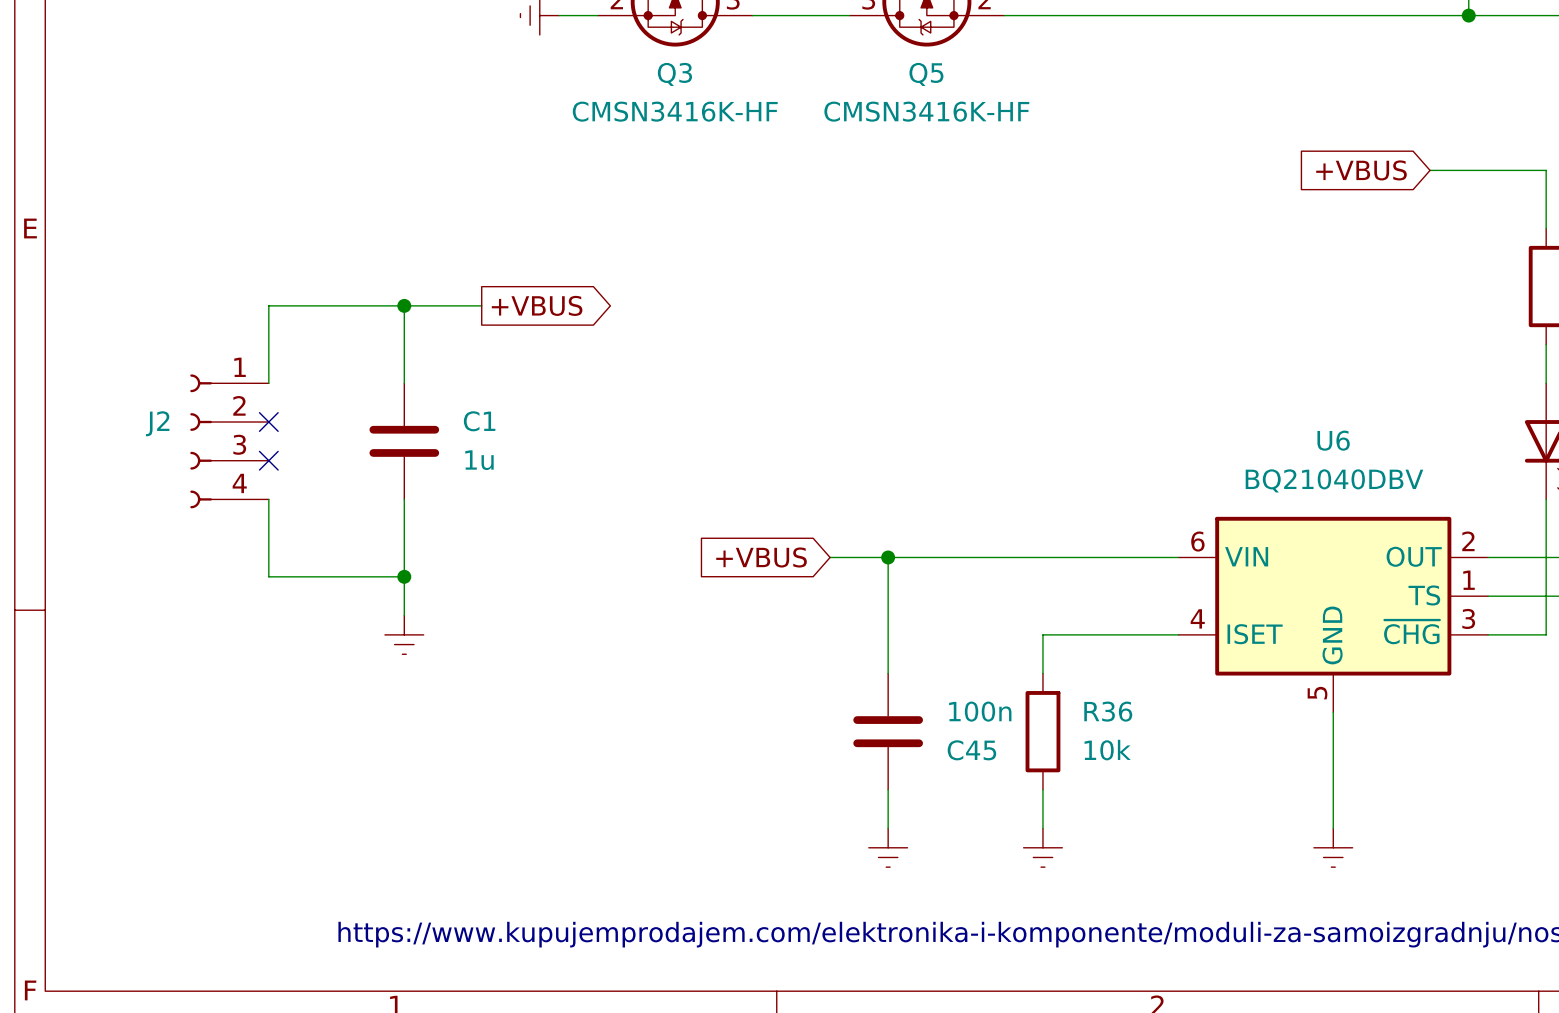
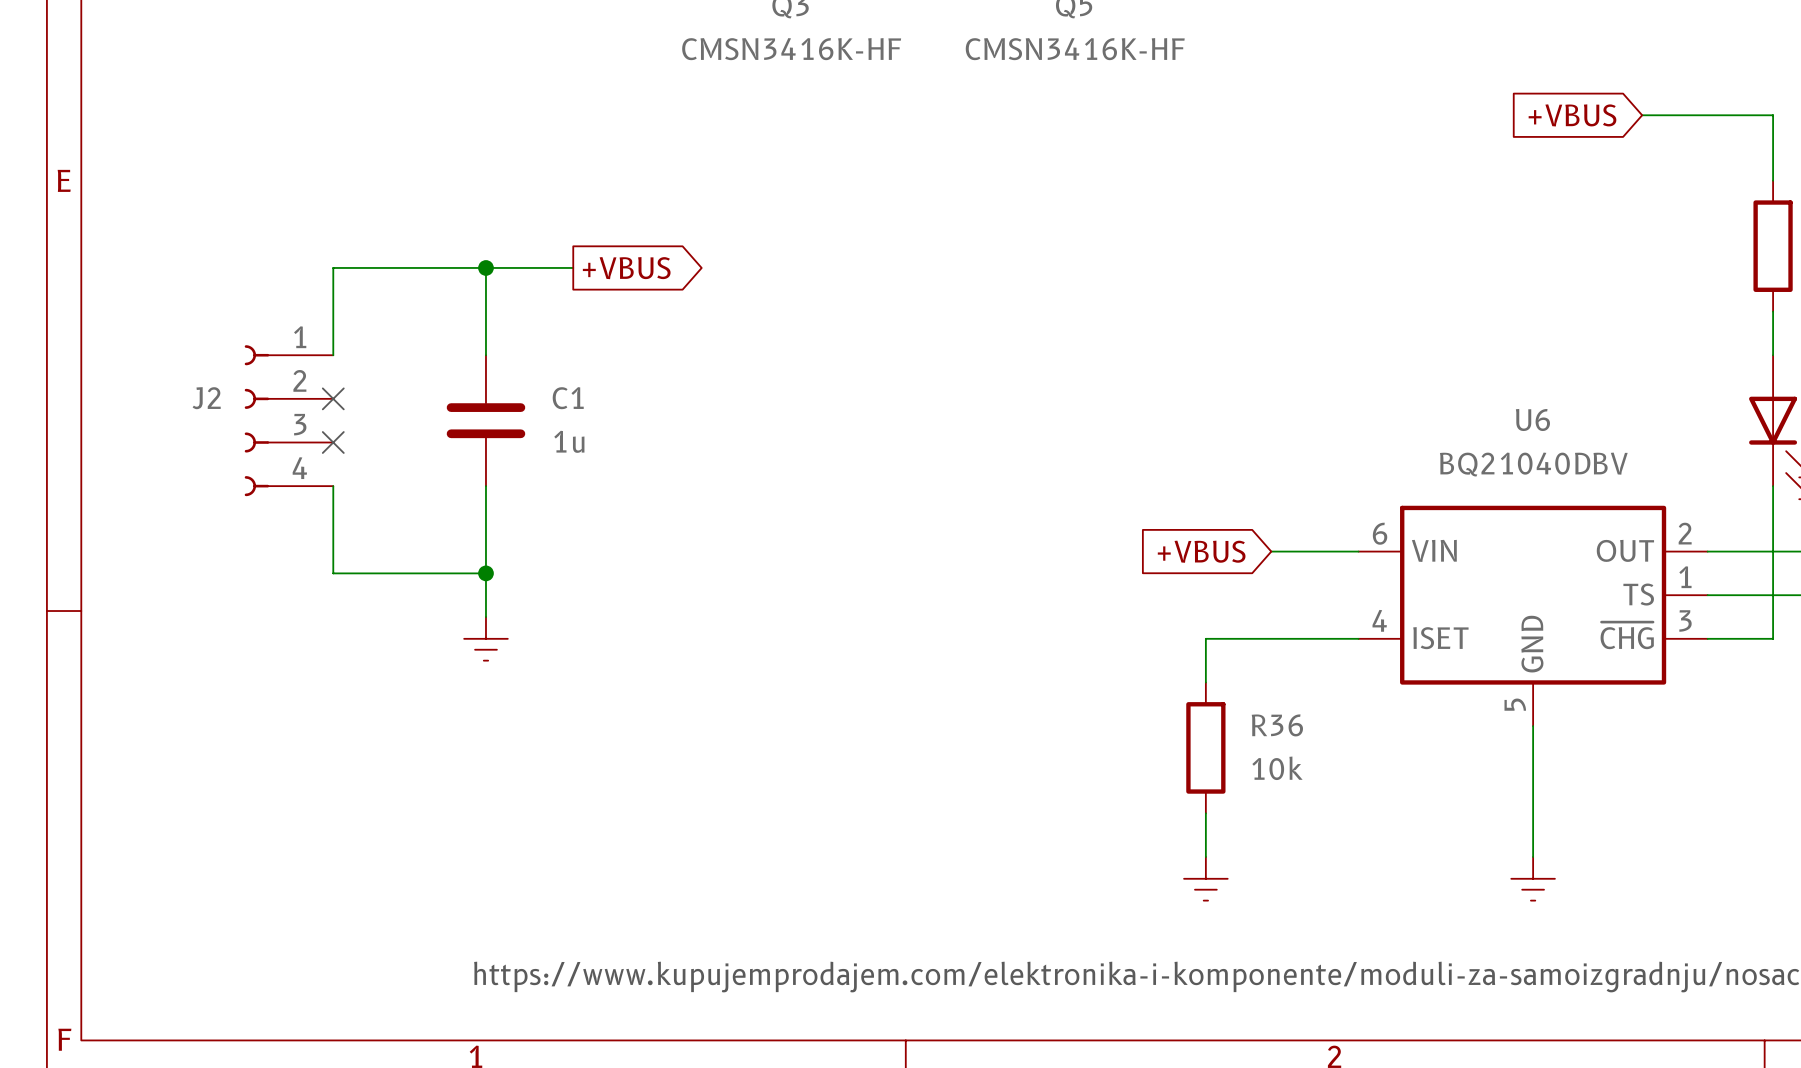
global label position: +VBUS (761, 557) -> +VBUS (1201, 551)
wire: (830, 557) (1101, 557) -> none
wire: (888, 557) (888, 673) -> none
junction: (888, 557) -> none
C45: 100n (888, 731) -> none
wire: (888, 789) (888, 828) -> none
power symbol: (888, 847) -> none

